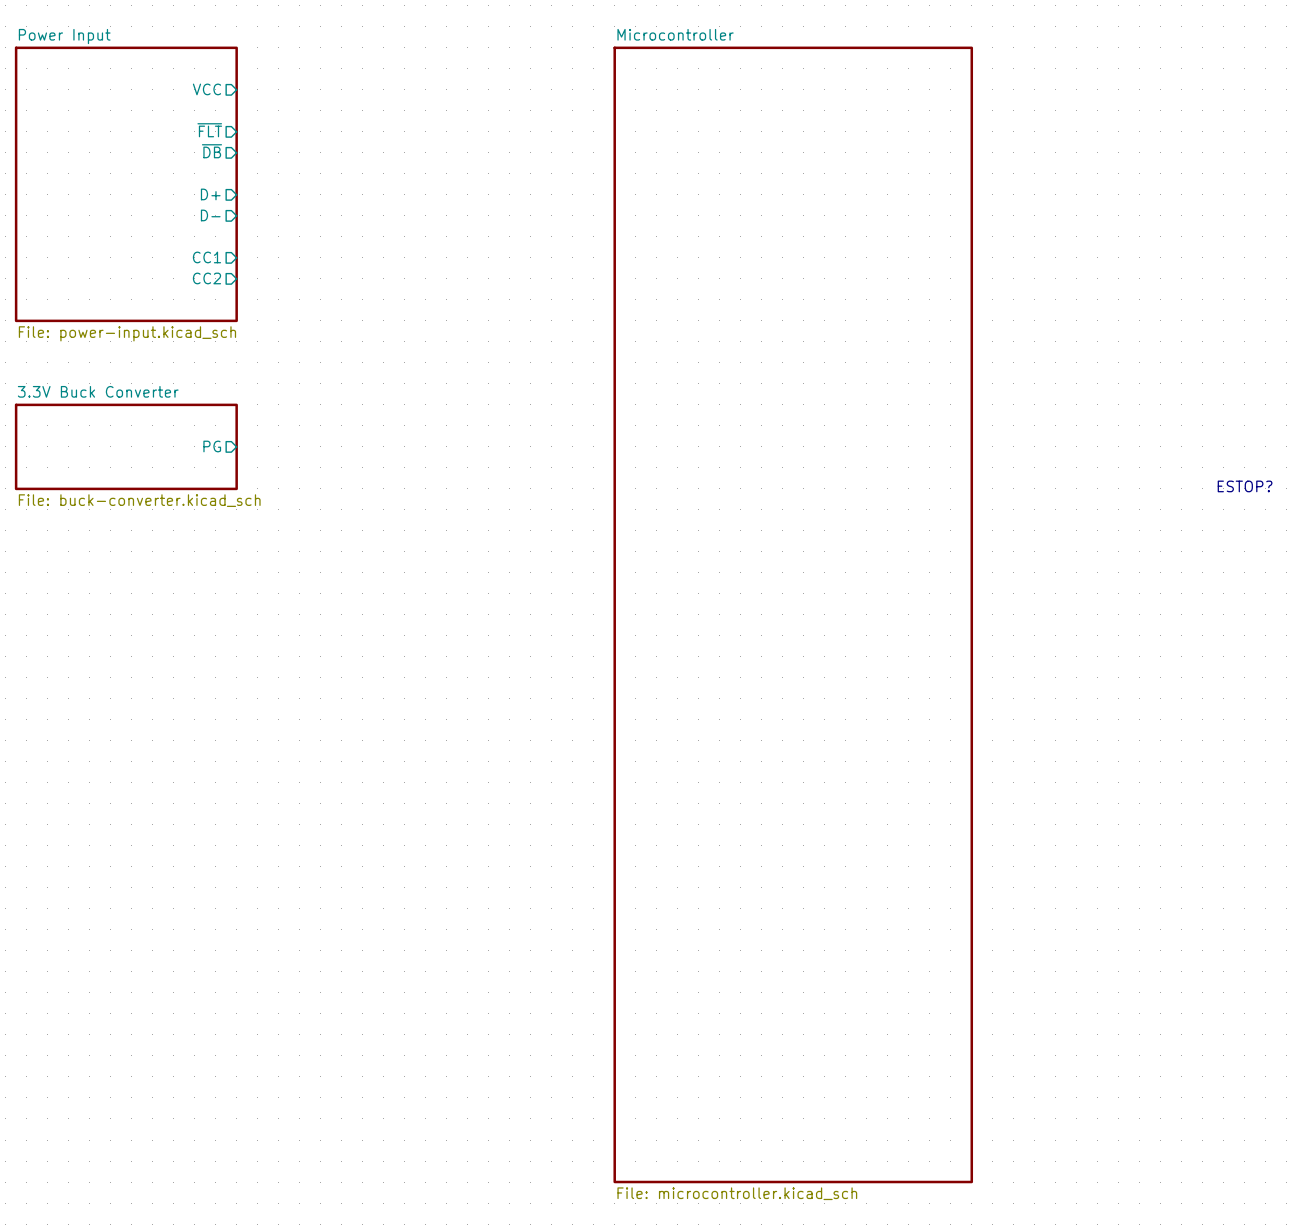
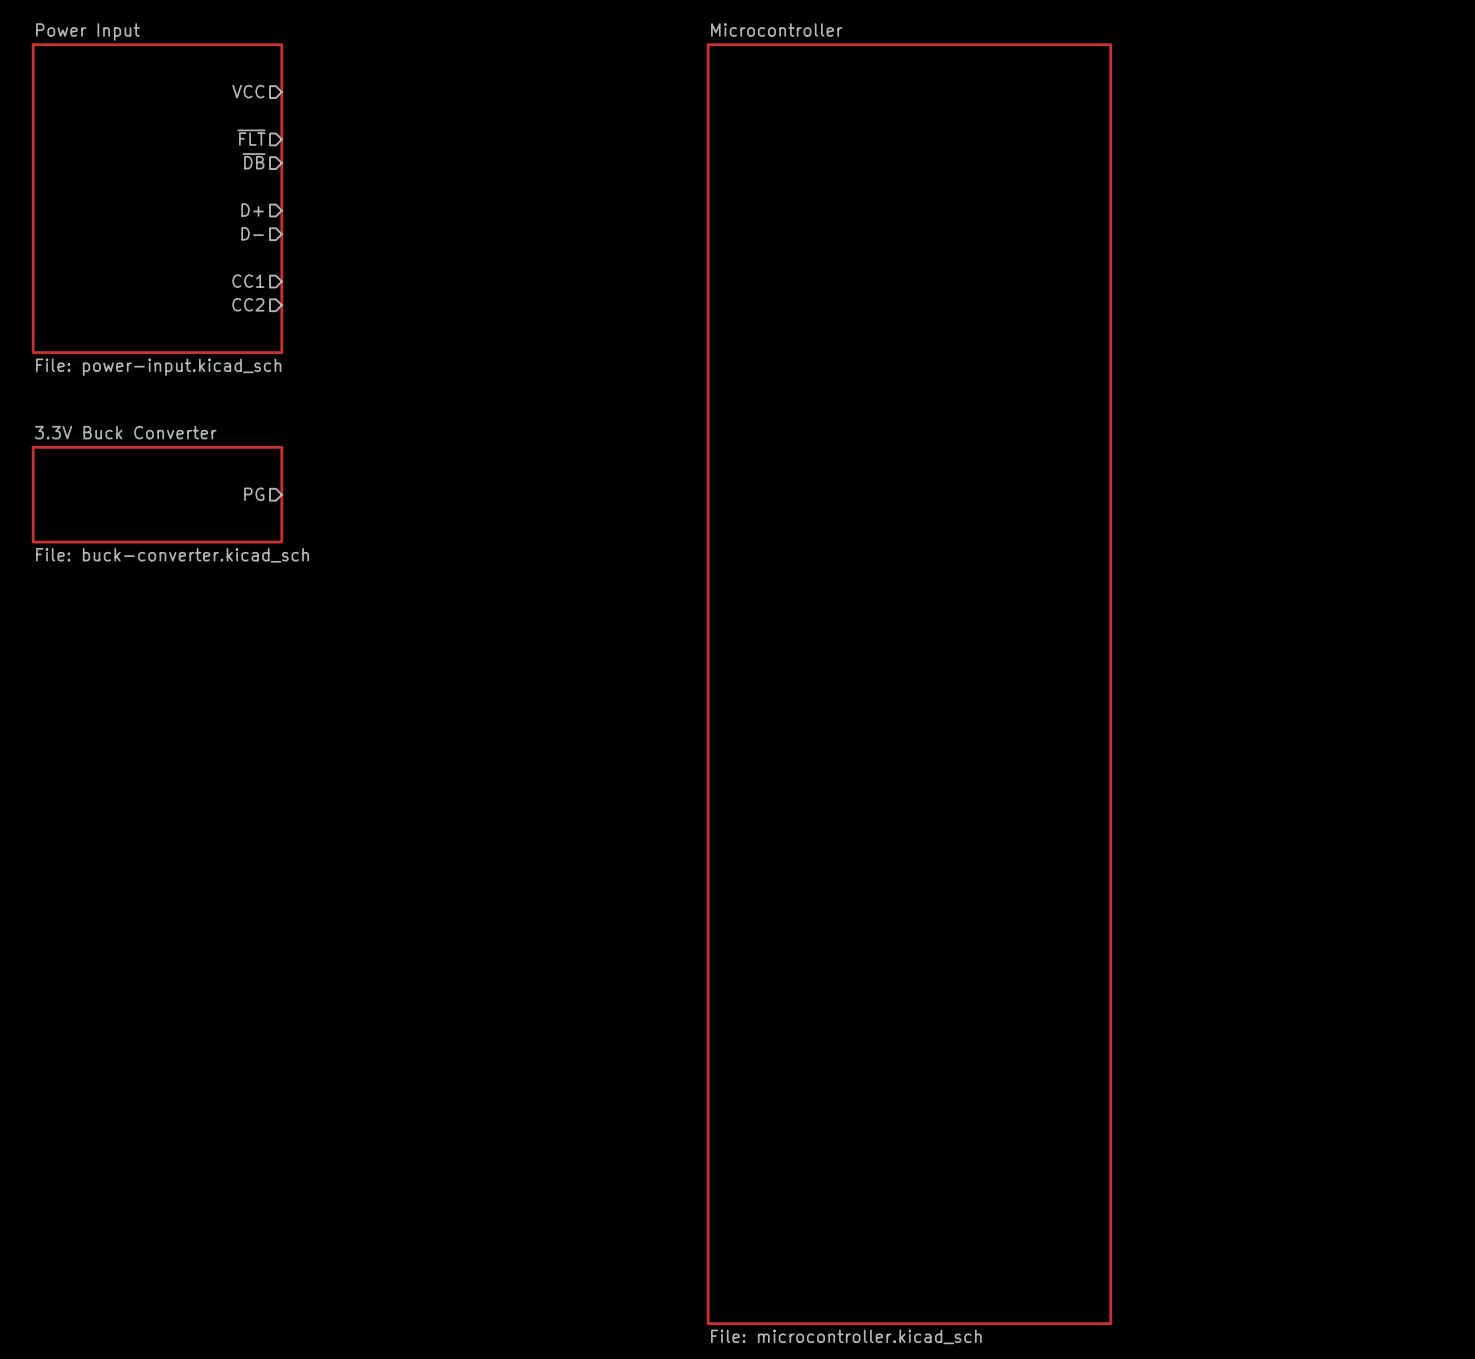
text: ESTOP? (1245, 486) -> none

